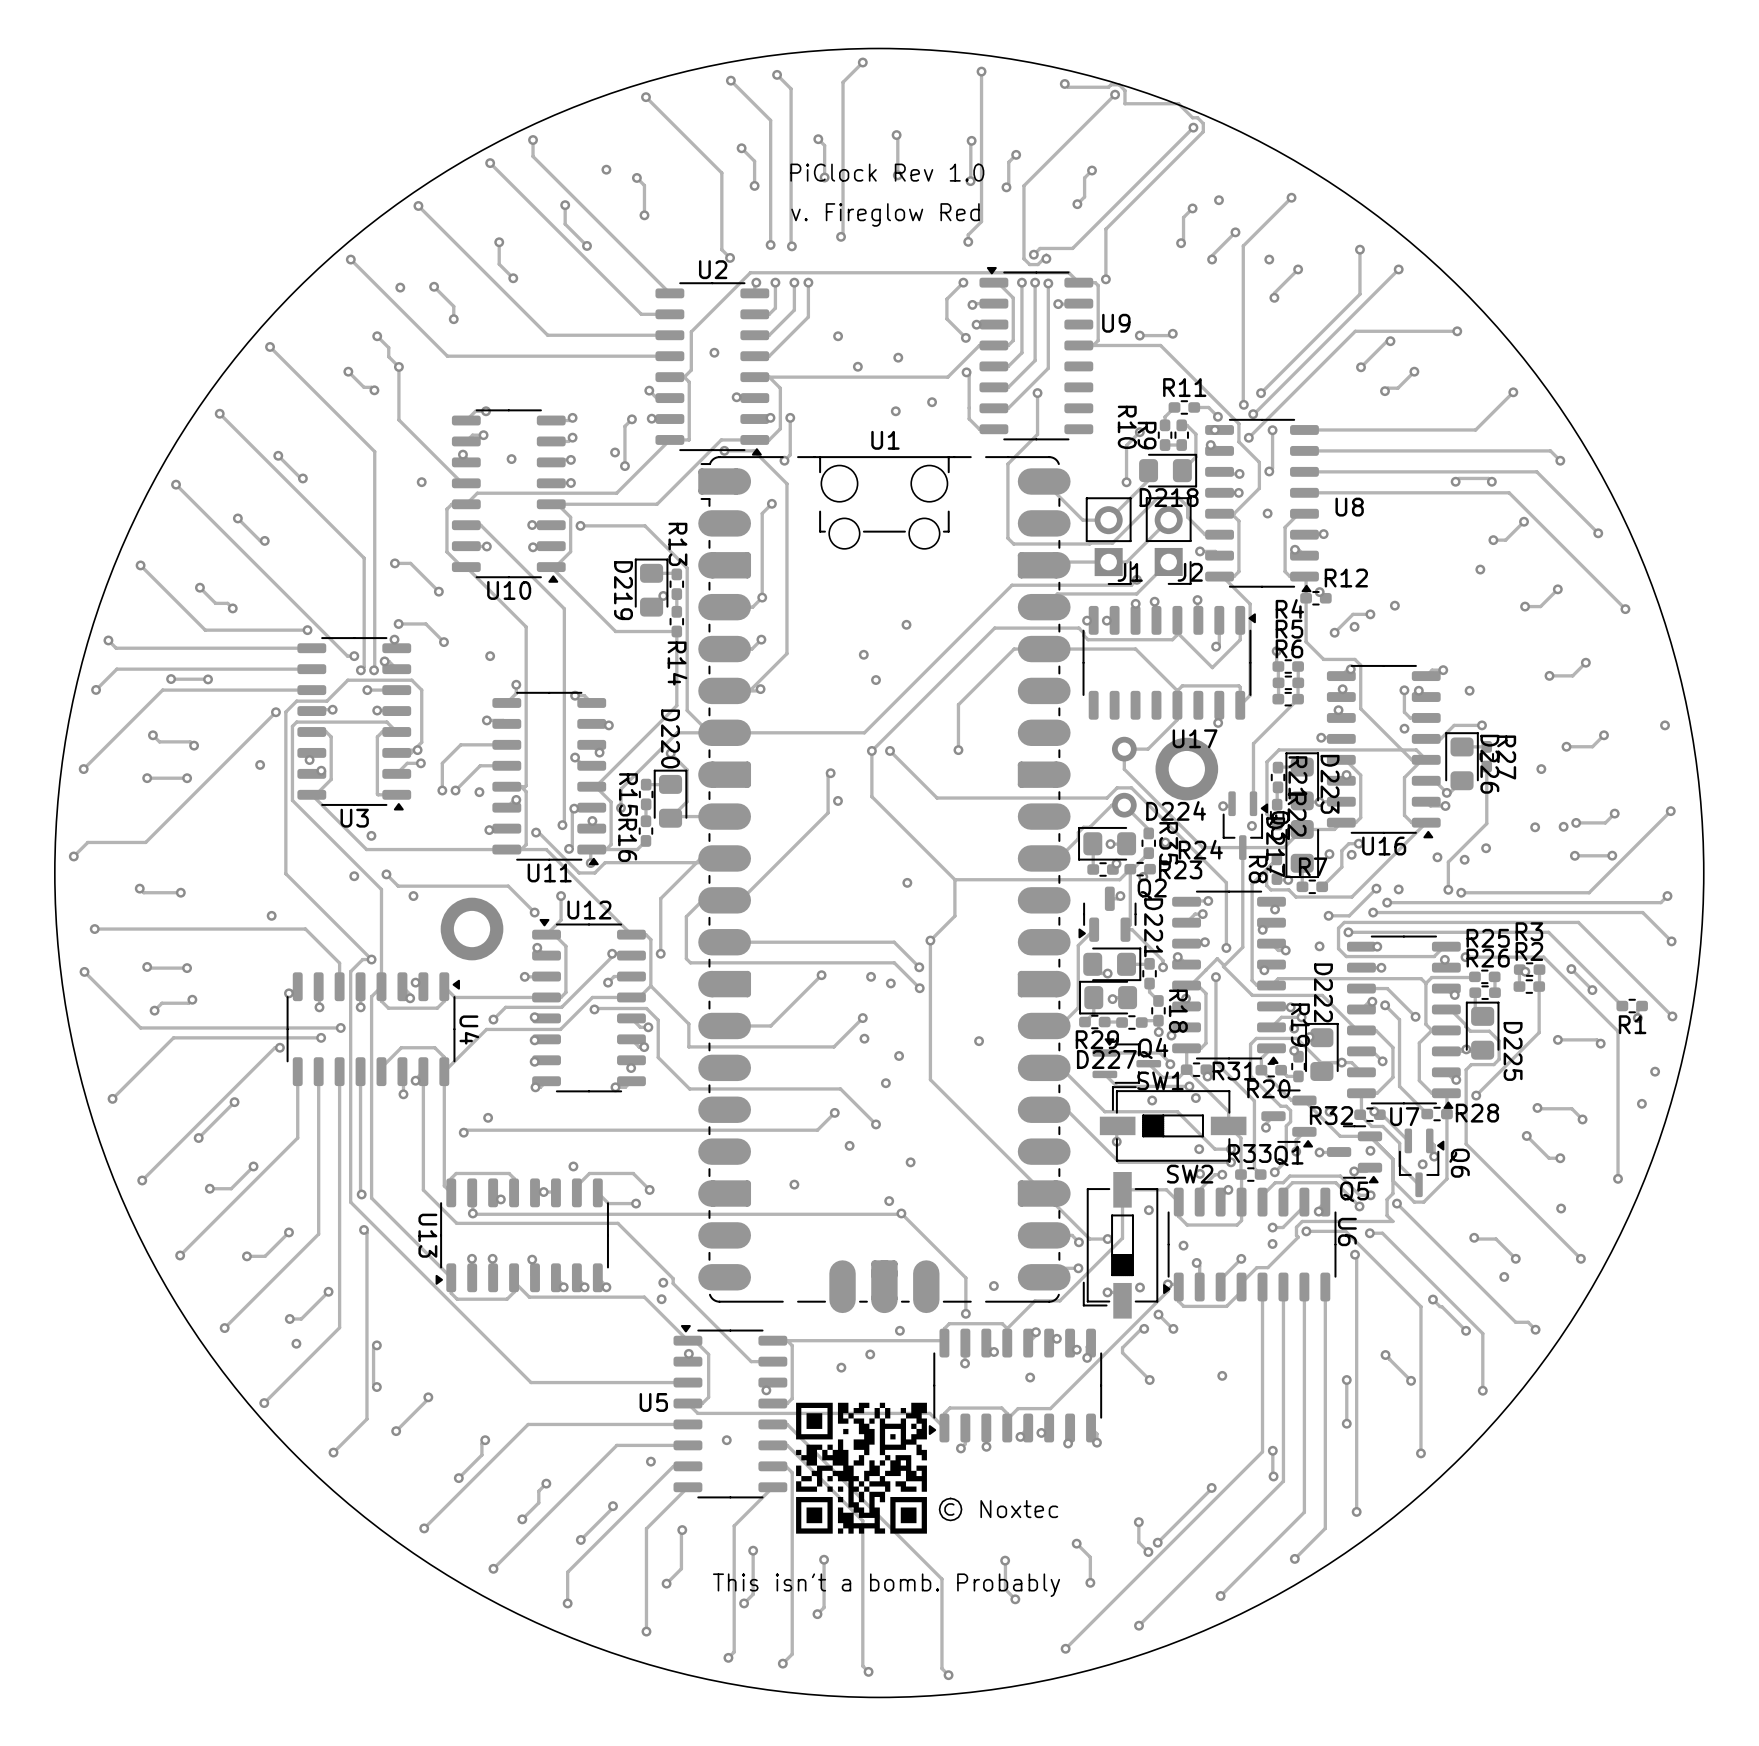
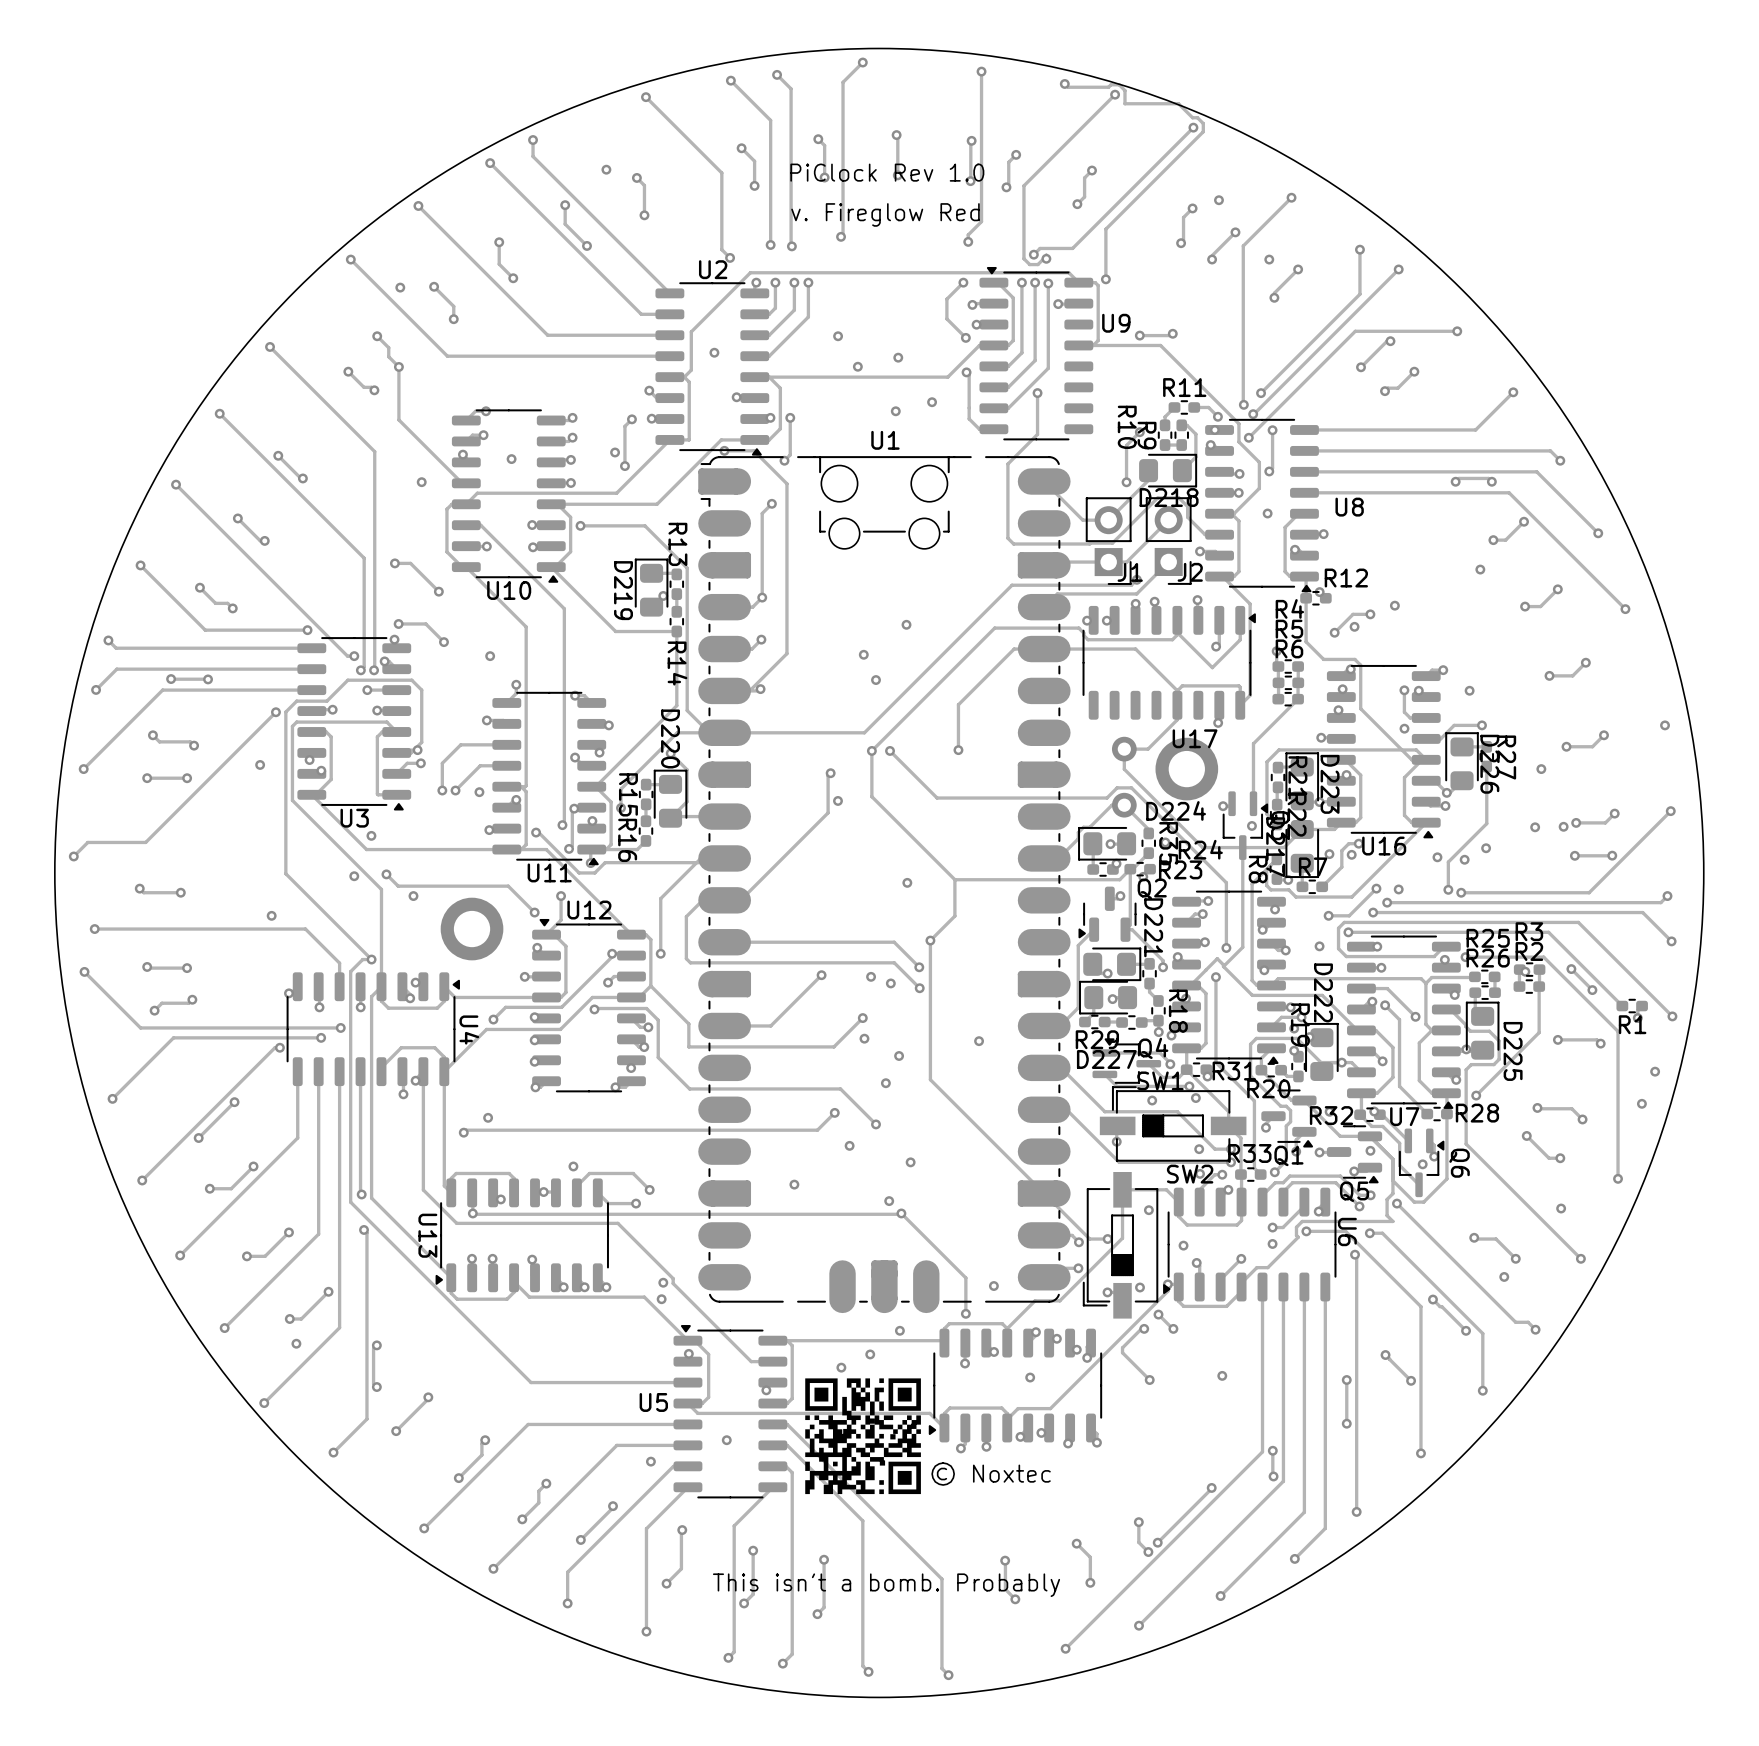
drawing: none -> [805, 1378, 921, 1495]
drawing: [796, 1402, 927, 1534] -> none
drawing shape: [837, 1402, 854, 1424] -> [842, 1410, 847, 1416]
drawing shape: [853, 1402, 870, 1414] -> [860, 1406, 866, 1411]
drawing shape: [796, 1439, 886, 1534] -> [837, 1484, 843, 1490]
drawing shape: [869, 1476, 891, 1492] -> [879, 1480, 884, 1485]
text position: © Noxtec (998, 1509) -> © Noxtec (991, 1474)

